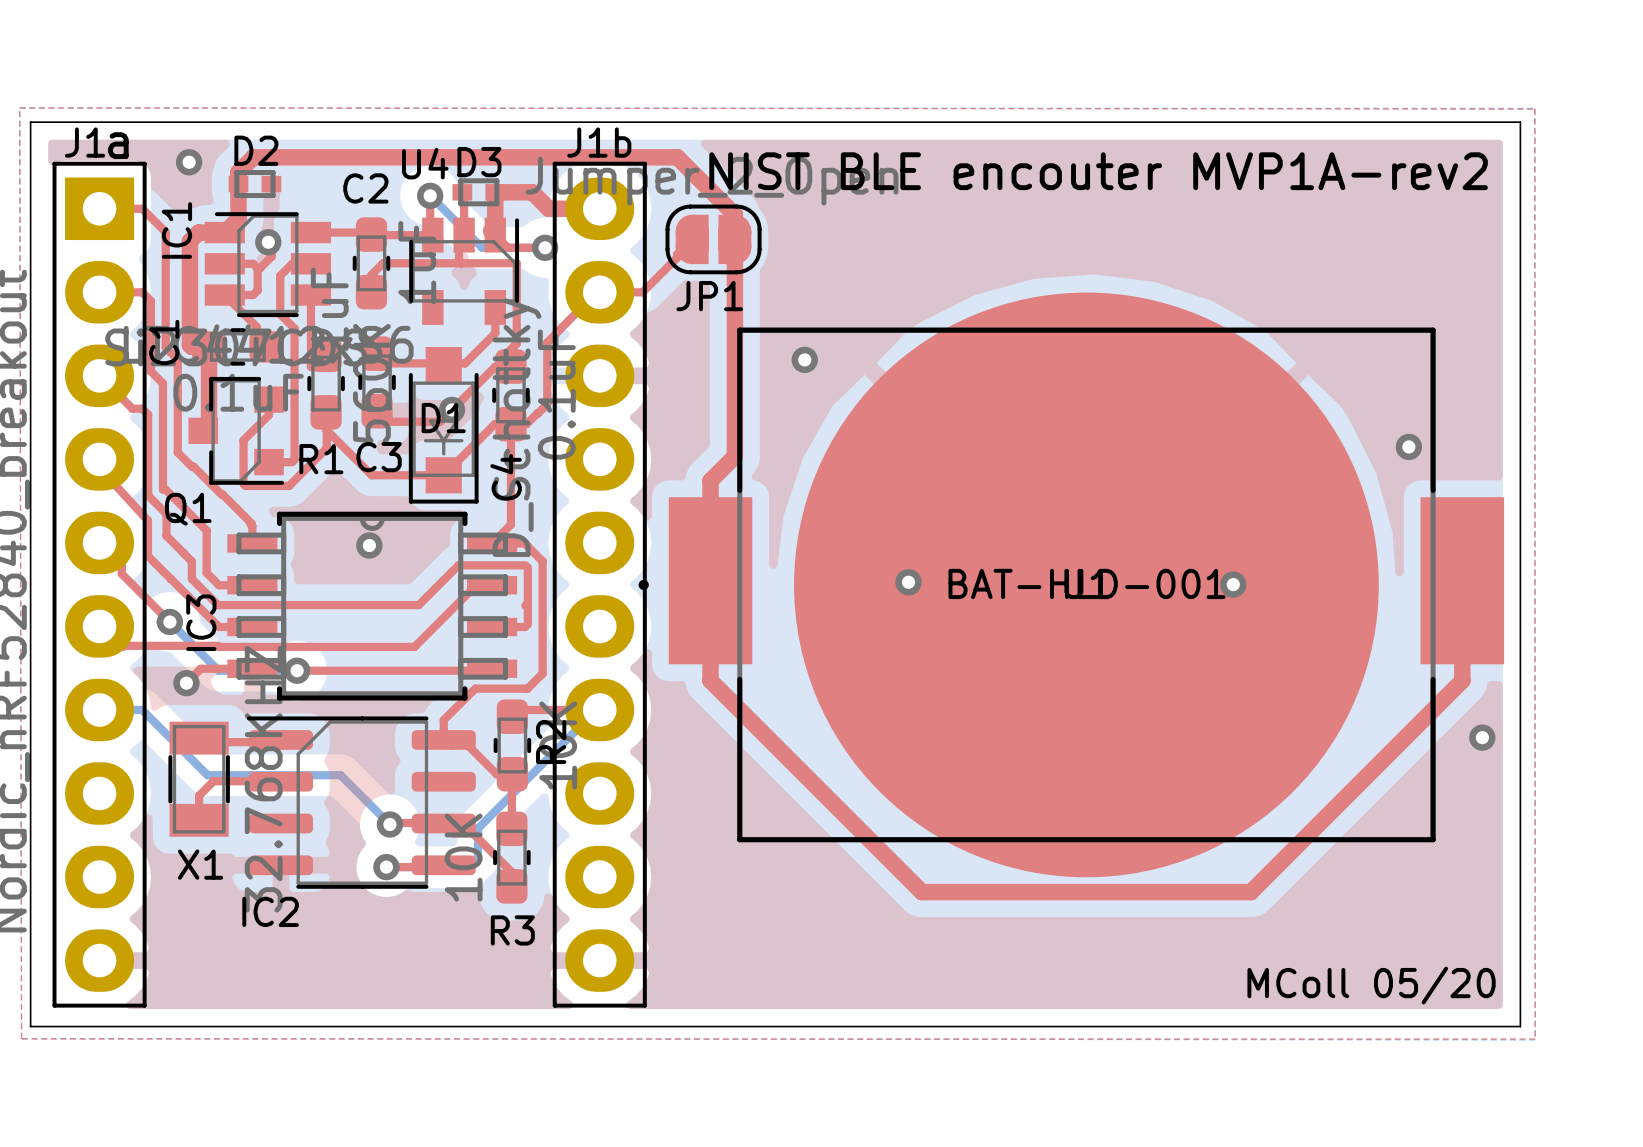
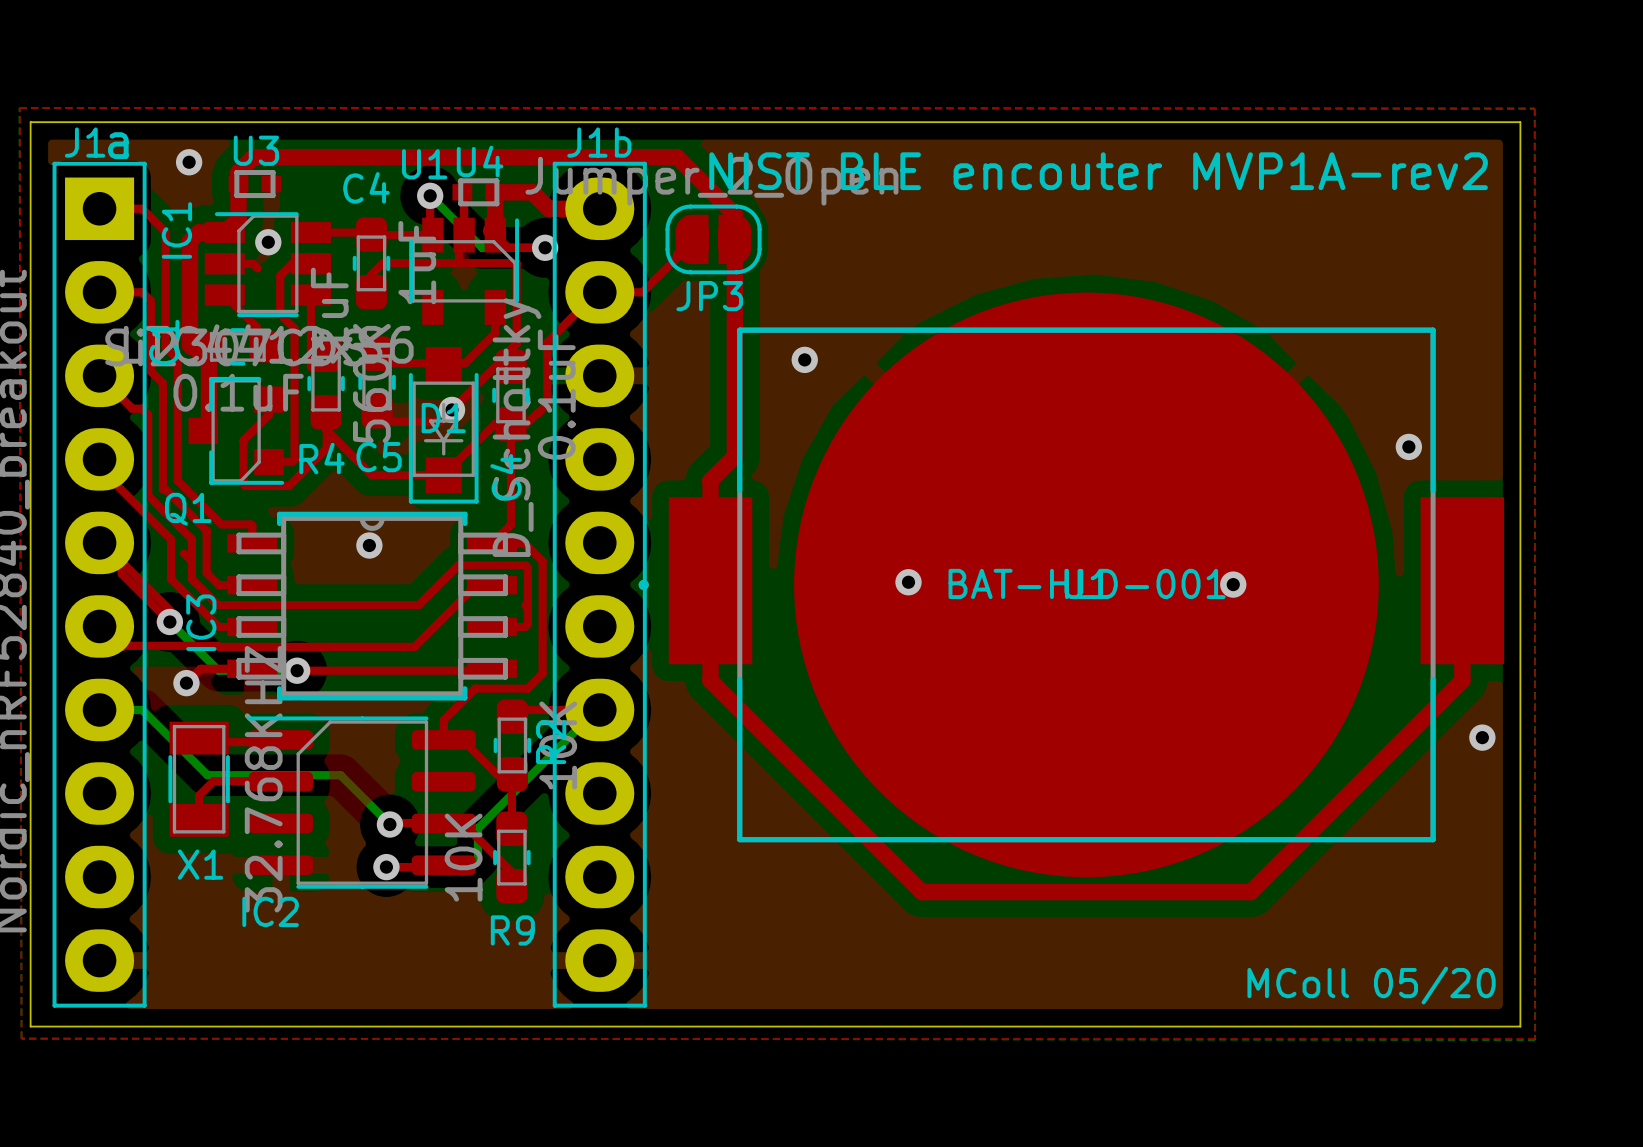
D2 name: D2 (256, 150) -> U3 (256, 150)
D3 name: D3 (479, 162) -> U4 (480, 161)
U4 name: U4 (425, 163) -> U1 (424, 164)
C2 name: C2 (365, 188) -> C4 (366, 187)
top track: (268, 242) (271, 245) (271, 256) (259, 268) (257, 268) (257, 290) (253, 295) (224, 295) -> none
JP1 name: JP1 (709, 296) -> JP3 (709, 296)
top track: (177, 452) (222, 494) (250, 524) -> (177, 452) (177, 480) (219, 522)
C3 name: C3 (379, 457) -> C5 (379, 457)
R1 name: R1 (321, 459) -> R4 (322, 458)
top track: (99, 467) (148, 520) (148, 556) (170, 579) -> (99, 467) (171, 539) (171, 579)
top track: (148, 495) (166, 514) (166, 535) (184, 553) -> (148, 495) (191, 539) (191, 561)
top track: none -> (221, 524) (250, 524)
top track: none -> (102, 542) (169, 610)
R3 name: R3 (512, 930) -> R9 (512, 930)

